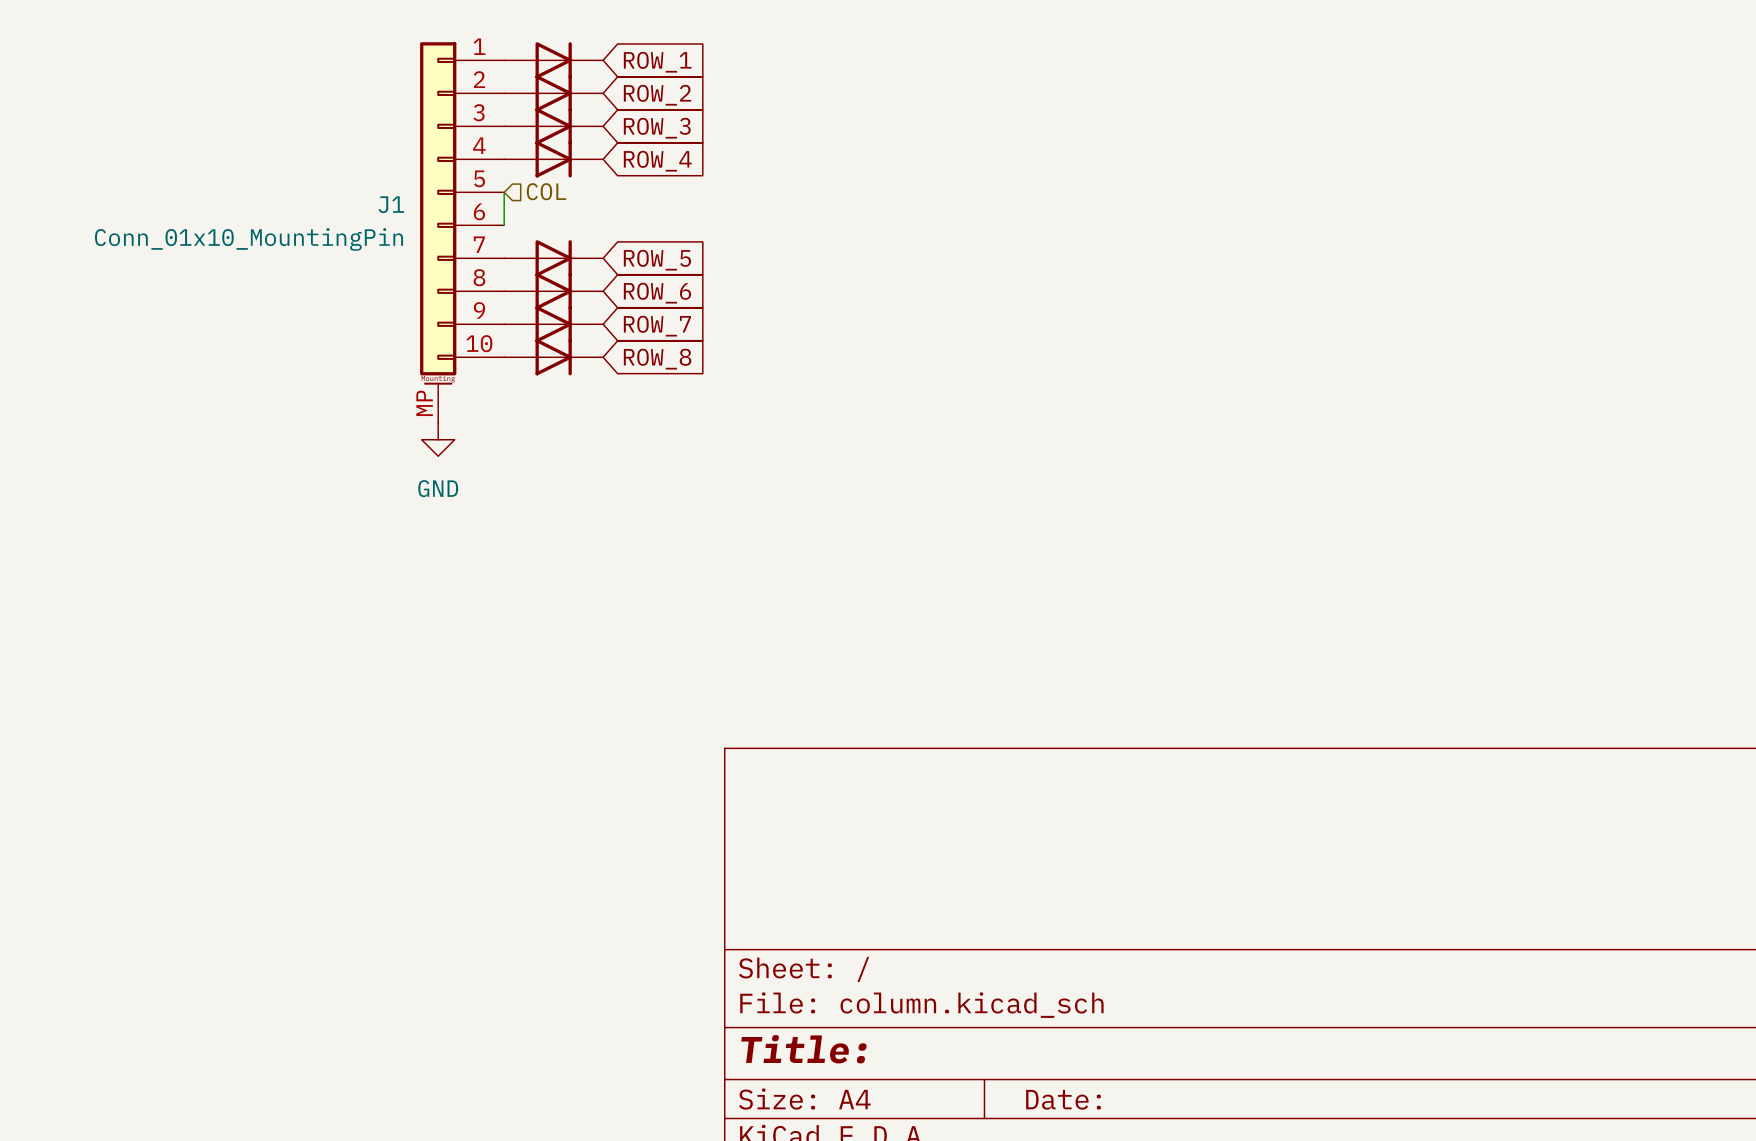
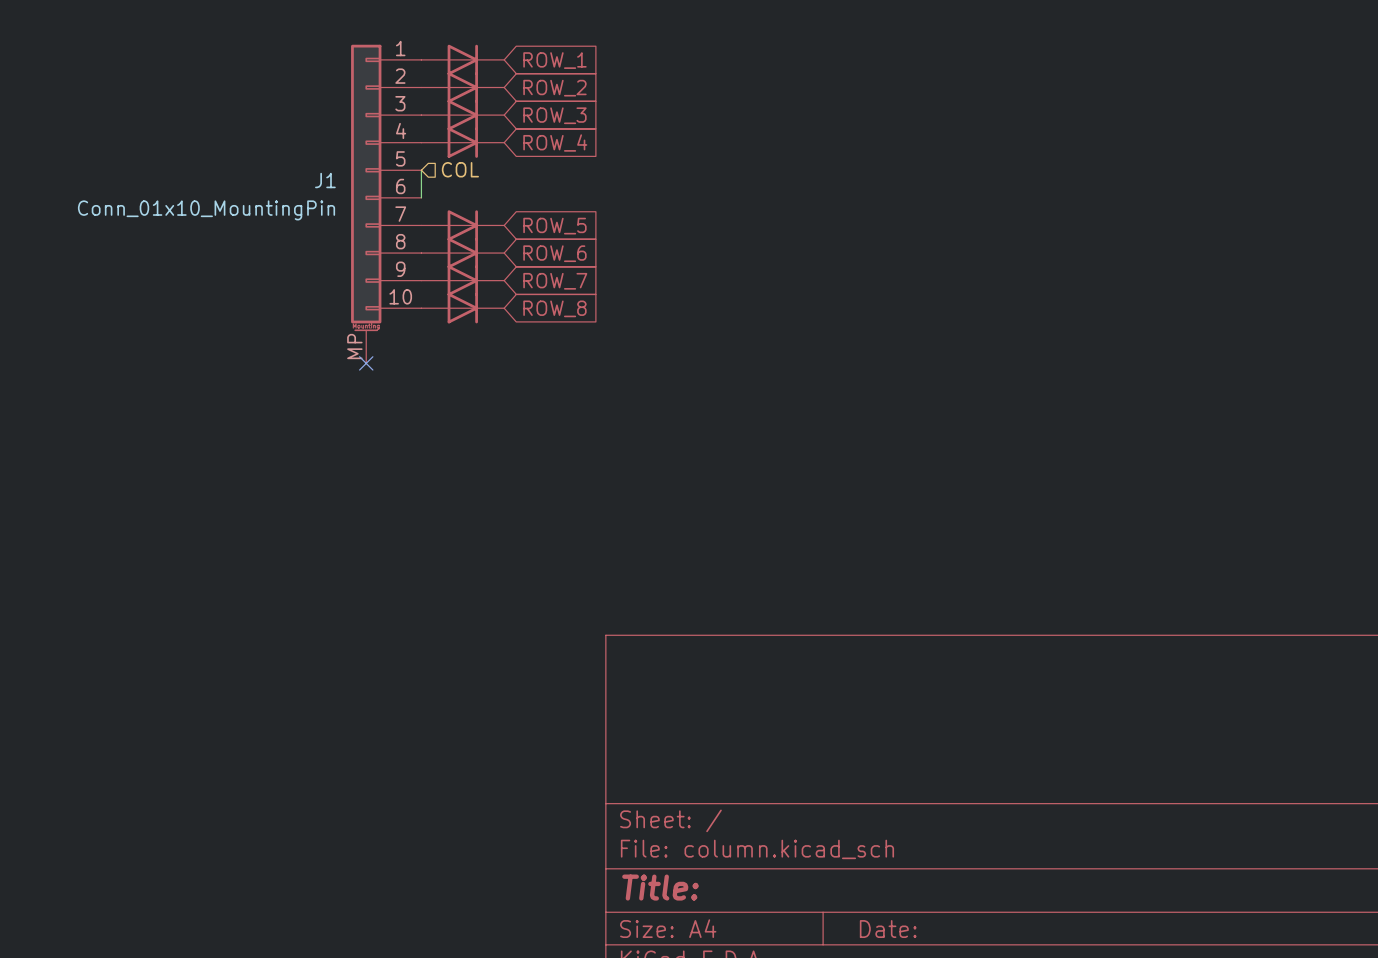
no-connect mark: none -> (366, 363)
power symbol: GND (438, 439) -> none

